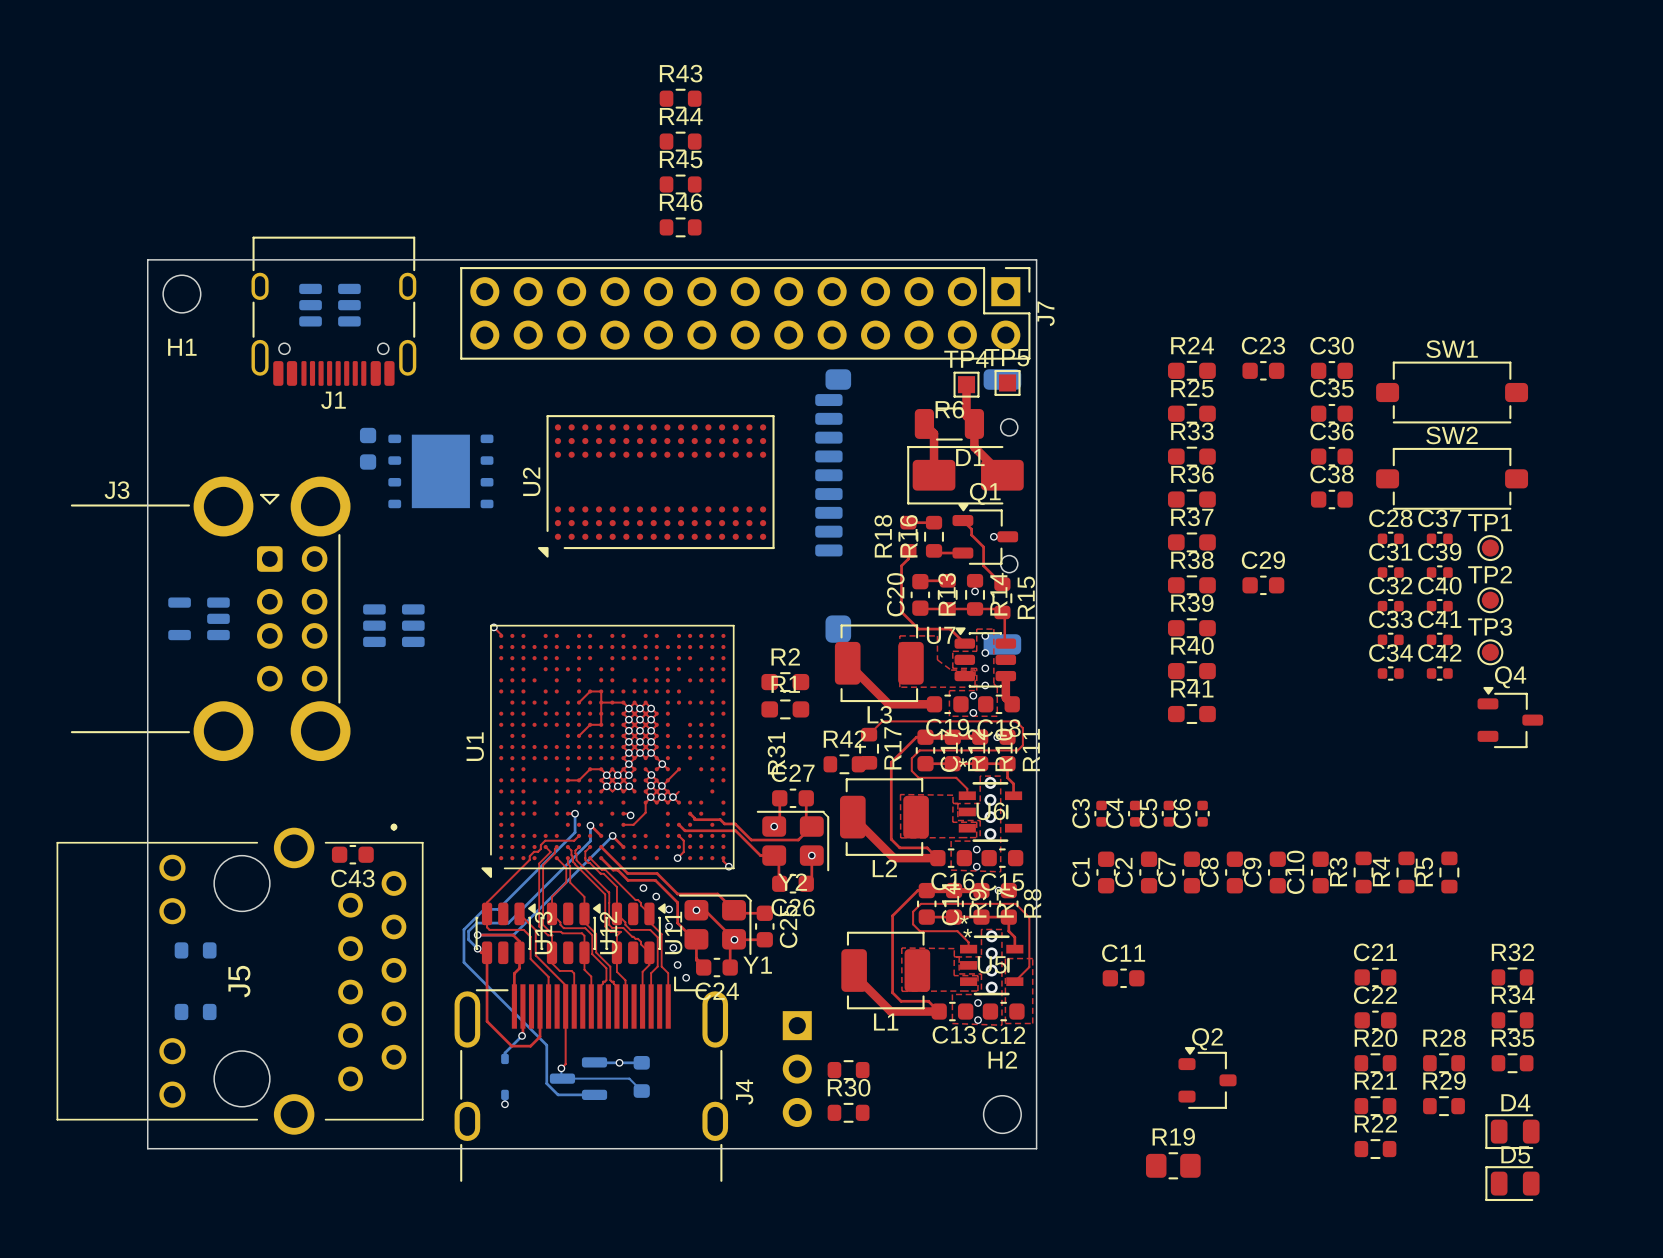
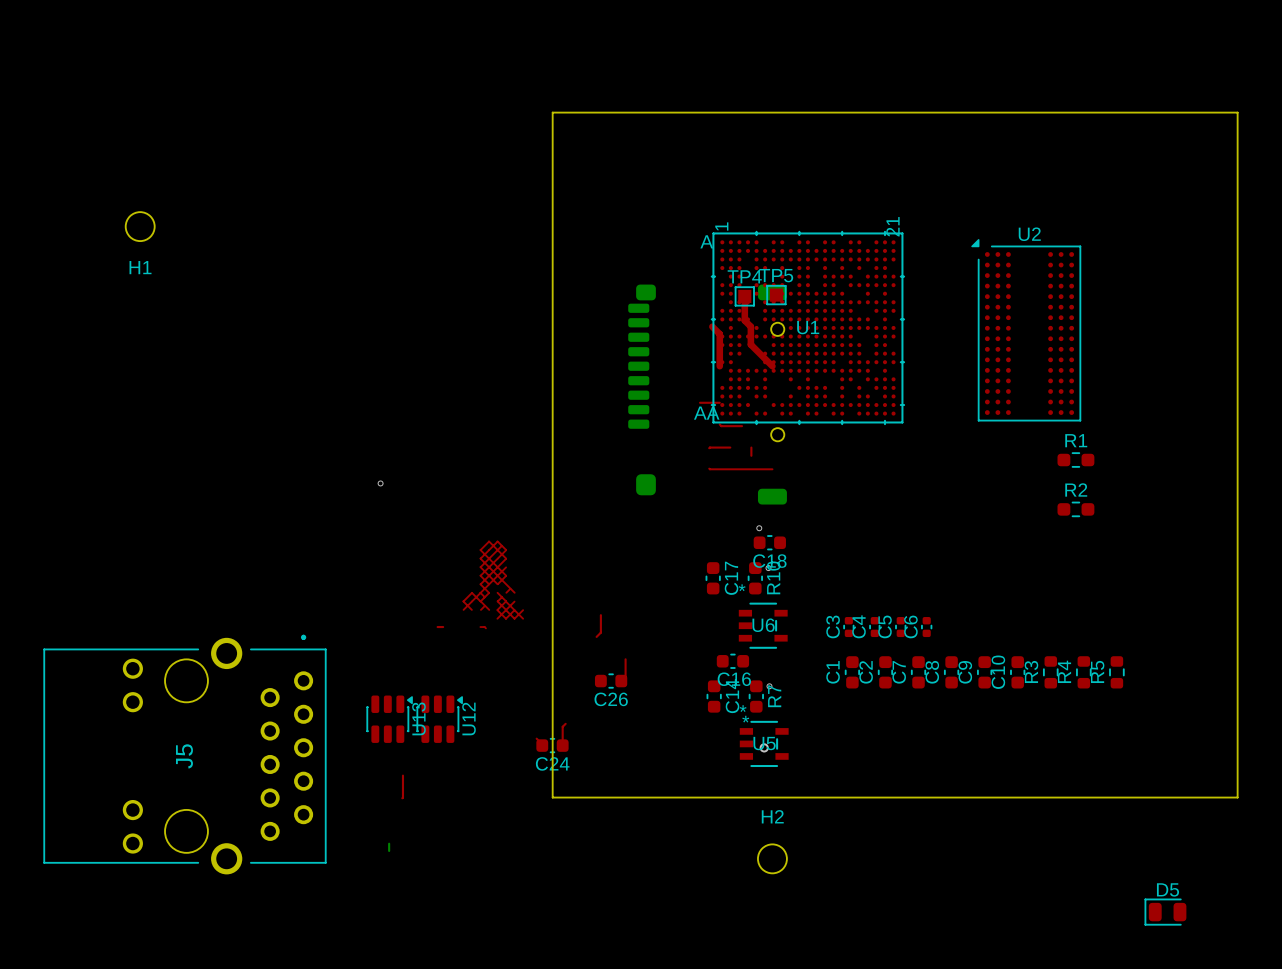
R43: (680, 98) -> none
R44: (680, 141) -> none
board edge: none -> (552, 112) (1237, 112) (1237, 797) (552, 797) (552, 112)
R45: (680, 184) -> none
R46: (680, 227) -> none
board edge: (147, 259) (1036, 259) (1036, 1148) (147, 1148) (147, 259) -> none
part: (330, 305) -> none
J1: (333, 311) -> none
J7: (745, 313) -> none
R24: (1191, 370) -> none
C23: (1263, 370) -> none
C30: (1331, 370) -> none
SW1: (1452, 392) -> none
R25: (1191, 413) -> none
C35: (1331, 413) -> none
R6: (949, 423) -> none
part: (368, 448) -> none
R33: (1191, 456) -> none
C36: (1331, 456) -> none
part: (440, 471) -> none
D1: (965, 475) -> none
SW2: (1452, 478) -> none
U2 rotation: 0° (656, 486) -> 90° clockwise (1026, 330)
U2 position: (656, 486) -> (1026, 330)
R36: (1191, 499) -> none
C38: (1331, 499) -> none
top track: (962, 520) (971, 529) (971, 535) (983, 547) (983, 565) (1002, 584) -> none
Q1: (985, 534) -> none
R18: (908, 536) -> none
R16: (934, 536) -> none
via: (993, 536) -> none
C28: (1390, 538) -> none
C37: (1439, 538) -> none
R37: (1191, 542) -> none
TP1: (1490, 548) -> none
top track: (908, 550) (908, 559) (901, 565) (901, 611) (918, 629) (950, 629) (964, 643) -> none
C31: (1390, 572) -> none
C39: (1439, 572) -> none
R38: (1191, 585) -> none
C29: (1263, 585) -> none
via: (975, 591) -> none
C20: (920, 594) -> none
R13: (947, 594) -> none
R14: (975, 594) -> none
R15: (1002, 598) -> none
TP2: (1490, 600) -> none
C32: (1390, 606) -> none
C40: (1439, 606) -> none
top track: (1002, 615) (1002, 609) (1004, 611) (1004, 643) -> none
part: (199, 618) -> none
J3: (210, 618) -> none
U1 footprint: [481, 624, 735, 878] -> [710, 230, 906, 426]
part: (393, 625) -> none
top track: (493, 627) (501, 635) -> none
R39: (1191, 628) -> none
top zone outline: (976, 629) (976, 651) (952, 651) (952, 668) (976, 668) (976, 690) (949, 690) (949, 716) (997, 716) (997, 687) (993, 683) (993, 629) (976, 629) -> none
top zone outline: (899, 635) (899, 687) (975, 687) (975, 670) (951, 670) (937, 659) (937, 635) (899, 635) -> none
via: (985, 635) -> none
C33: (1390, 639) -> none
C41: (1439, 639) -> none
TP3: (1490, 652) -> none
via: (985, 653) -> none
U7: (985, 657) -> none
top track: (847, 663) (888, 704) (934, 704) -> none
L3: (879, 663) -> none
via: (985, 668) -> none
R40: (1191, 671) -> none
C34: (1390, 673) -> none
C42: (1439, 673) -> none
top track: (1005, 676) (1005, 697) (1012, 704) -> none
R2 position: (785, 682) -> (1075, 509)
via: (973, 695) -> none
top track: (579, 702) (590, 691) (601, 691) (601, 724) (590, 724) (579, 735) -> none
top track: (601, 702) (623, 702) (656, 735) -> none
C19: (947, 704) -> none
via: (628, 708) -> none
via: (640, 708) -> none
via: (651, 708) -> none
R1 position: (785, 709) -> (1075, 460)
via: (973, 712) -> none
R41: (1191, 714) -> none
Q4: (1510, 717) -> none
via: (628, 719) -> none
via: (640, 719) -> none
via: (651, 719) -> none
via: (628, 730) -> none
via: (640, 730) -> none
via: (651, 730) -> none
top track: (869, 734) (882, 721) (1016, 721) (1022, 728) (1022, 745) (1017, 750) (919, 750) (911, 758) (911, 770) (918, 777) (956, 777) (967, 788) (967, 795) -> none
top track: (980, 737) (916, 737) (891, 762) (891, 839) (899, 847) (927, 847) (937, 858) (893, 858) (852, 817) -> none
via: (628, 741) -> none
via: (640, 741) -> none
via: (651, 741) -> none
U1 name position: U1 (475, 746) -> U1 (808, 327)
R17: (869, 748) -> none
R12: (952, 750) -> none
R11: (1007, 750) -> none
via: (628, 753) -> none
via: (640, 753) -> none
via: (651, 753) -> none
top track: (925, 763) (1007, 763) (1007, 777) (1013, 783) (1013, 795) -> none
via: (628, 764) -> none
via: (662, 764) -> none
R42: (844, 764) -> none
top track: (678, 769) (667, 780) -> none
via: (651, 774) -> none
via: (606, 775) -> none
via: (617, 775) -> none
via: (628, 775) -> none
top track: (567, 780) (579, 780) (590, 769) (601, 769) (623, 791) -> none
top track: (623, 780) (612, 791) -> none
via: (990, 782) -> none
via: (650, 785) -> none
via: (606, 786) -> none
via: (617, 786) -> none
via: (629, 786) -> none
via: (661, 786) -> none
top zone outline: (900, 794) (953, 795) (952, 822) (976, 822) (976, 837) (900, 837) (900, 794) -> none
via: (650, 797) -> none
via: (661, 797) -> none
via: (673, 797) -> none
C27: (793, 798) -> none
top track: (806, 798) (806, 820) (811, 826) (798, 840) (751, 840) (735, 823) (724, 823) (720, 819) (694, 819) (690, 813) -> none
via: (990, 800) -> none
top track: (645, 802) (645, 812) (633, 824) (623, 824) -> none
top zone outline: (952, 803) (957, 803) (957, 811) (957, 820) (980, 820) (980, 841) (951, 841) (951, 870) (1000, 871) (1000, 776) (980, 776) (980, 803) (952, 803) -> none
bottom track: (575, 813) (575, 832) (498, 909) (484, 909) (463, 929) (463, 962) (546, 1045) (546, 1083) (558, 1094) (594, 1094) -> none
via: (575, 813) -> none
via: (630, 815) -> none
L2: (884, 817) -> none
via: (990, 817) -> none
top track: (678, 824) (684, 830) (735, 830) (760, 855) (774, 855) (778, 860) (778, 883) -> none
top track: (590, 825) (601, 835) -> none
bottom track: (590, 825) (590, 841) (508, 923) (476, 923) (468, 931) (468, 939) (477, 948) -> none
via: (590, 825) -> none
via: (774, 826) -> none
via: (990, 834) -> none
top track: (579, 835) (574, 840) (545, 840) (540, 845) (540, 849) (538, 851) (534, 851) (529, 856) (529, 859) (487, 902) (487, 927) (489, 929) (523, 929) (530, 936) (530, 958) (548, 976) (548, 1006) -> none
bottom track: (612, 835) (513, 935) (477, 935) -> none
via: (612, 835) -> none
top track: (678, 835) (683, 840) (683, 851) (677, 858) -> none
top track: (612, 836) (623, 847) -> none
Y2: (793, 841) -> none
top track: (545, 847) (550, 852) (539, 863) (539, 926) (548, 935) (552, 935) (551, 963) (559, 970) (571, 970) (574, 973) (574, 1006) -> none
top track: (556, 847) (554, 853) (543, 865) (543, 924) (550, 931) (582, 933) (584, 935) (584, 969) (591, 976) (591, 1006) -> none
top track: (567, 847) (571, 850) (572, 861) (605, 894) (605, 926) (610, 931) (620, 931) (616, 935) (616, 971) (625, 980) (625, 1006) -> none
top track: (579, 847) (575, 850) (576, 860) (609, 892) (609, 924) (612, 927) (623, 927) (632, 936) (637, 938) (649, 952) (649, 964) (642, 971) (642, 1006) -> none
top track: (590, 847) (585, 851) (585, 858) -> none
top track: (601, 847) (627, 873) (657, 873) (677, 894) (717, 894) (737, 913) (764, 913) -> none
via: (976, 849) -> none
C43: (352, 854) -> none
via: (811, 855) -> none
top track: (556, 858) (566, 867) (566, 882) (551, 896) (551, 913) (563, 928) (585, 928) (592, 935) (592, 954) (606, 968) (606, 980) (599, 986) (599, 1006) -> none
top track: (567, 858) (567, 863) (570, 865) (570, 882) (584, 896) (584, 922) (596, 933) (596, 952) (610, 966) (610, 980) (616, 986) (616, 1006) -> none
top track: (585, 858) (600, 873) -> none
top track: (590, 858) (640, 902) (640, 905) (649, 913) (649, 921) (661, 934) (661, 966) (668, 973) (668, 1006) -> none
top track: (601, 858) (613, 870) (617, 870) (628, 880) (655, 880) (677, 902) (677, 923) (693, 939) (696, 939) (696, 960) (703, 967) -> none
via: (677, 858) -> none
top track: (723, 858) (723, 861) (728, 866) -> none
C15: (1002, 858) -> none
via: (728, 866) -> none
via: (976, 866) -> none
top track: (600, 873) (603, 873) (616, 886) (616, 913) (625, 922) (625, 924) (630, 929) (650, 929) (657, 937) (657, 966) (651, 973) (651, 1006) -> none
via: (643, 888) -> none
top track: (981, 890) (917, 890) (892, 915) (892, 992) (901, 1001) (928, 1001) (939, 1011) (890, 1011) (854, 974) (854, 963) -> none
via: (656, 896) -> none
R9: (954, 903) -> none
R8: (1008, 903) -> none
via: (669, 909) -> none
top track: (696, 910) (704, 910) (734, 939) (764, 939) -> none
via: (696, 910) -> none
top track: (519, 913) (535, 930) (535, 955) (565, 985) (565, 1064) (561, 1068) -> none
top track: (926, 917) (1008, 917) (1008, 931) (1014, 937) (1014, 949) -> none
Y1: (715, 924) -> none
via: (669, 926) -> none
C25: (764, 926) -> none
U11: (635, 933) -> none
top track: (477, 935) (513, 935) (519, 941) (519, 968) (514, 973) (514, 1006) -> none
via: (477, 935) -> none
via: (991, 936) -> none
via: (734, 939) -> none
via: (673, 947) -> none
top zone outline: (901, 947) (954, 948) (954, 975) (978, 975) (977, 991) (901, 991) (901, 947) -> none
top track: (477, 948) (481, 952) (487, 952) (487, 1021) (511, 1046) (530, 1046) (540, 1036) (540, 1006) -> none
via: (477, 948) -> none
top track: (968, 949) (968, 942) (957, 931) (919, 931) (913, 924) (913, 911) (921, 903) (1015, 903) (1029, 917) (1029, 967) (1014, 981) -> none
part: (195, 950) -> none
via: (991, 953) -> none
top zone outline: (954, 956) (959, 956) (959, 964) (959, 973) (981, 973) (981, 994) (952, 994) (952, 1023) (1001, 1025) (1001, 929) (981, 929) (981, 956) (954, 957) -> none
top zone outline: (1005, 958) (1005, 1023) (1032, 1023) (1032, 958) (1005, 958) -> none
via: (677, 964) -> none
L1: (885, 970) -> none
via: (686, 977) -> none
C21: (1375, 977) -> none
R32: (1512, 977) -> none
C11: (1123, 978) -> none
via: (991, 987) -> none
via: (978, 1002) -> none
part: (195, 1011) -> none
C13: (952, 1011) -> none
C12: (1003, 1011) -> none
via: (978, 1020) -> none
C22: (1375, 1020) -> none
R34: (1512, 1020) -> none
bottom track: (522, 1035) (504, 1052) (504, 1058) -> none
via: (522, 1035) -> none
bottom track: (594, 1062) (641, 1062) -> none
via: (619, 1062) -> none
R20: (1375, 1063) -> none
R28: (1444, 1063) -> none
R35: (1512, 1063) -> none
bottom track: (561, 1068) (562, 1078) (629, 1078) (641, 1091) -> none
via: (561, 1068) -> none
part: (797, 1069) -> none
R31: (848, 1070) -> none
part: (504, 1076) -> none
part: (641, 1076) -> none
Q2: (1207, 1077) -> none
part: (578, 1078) -> none
J4: (591, 1079) -> none
via: (504, 1104) -> none
R21: (1375, 1106) -> none
R29: (1444, 1106) -> none
R30: (848, 1112) -> none
D4: (1512, 1131) -> none
R22: (1375, 1149) -> none
R19: (1173, 1165) -> none

